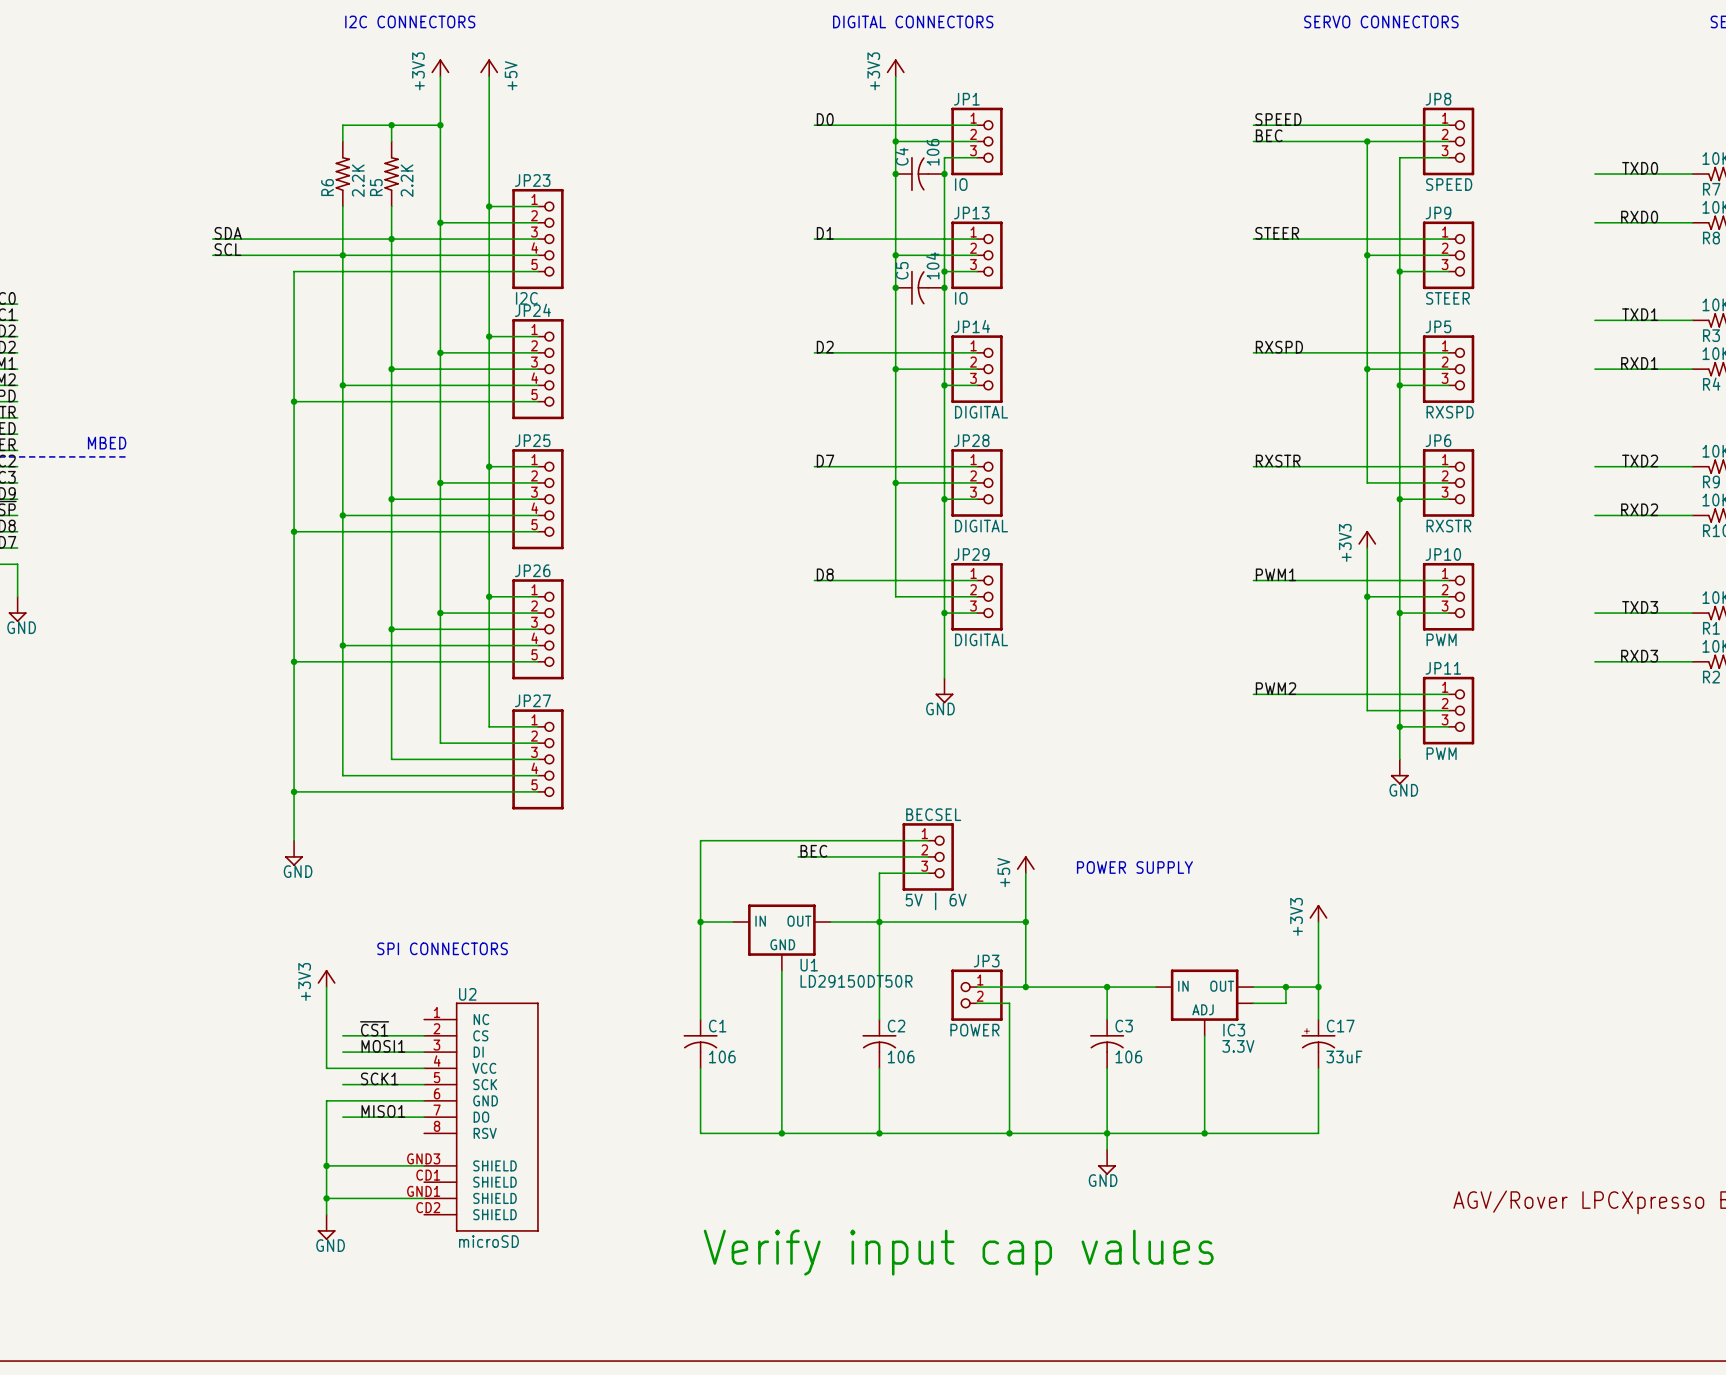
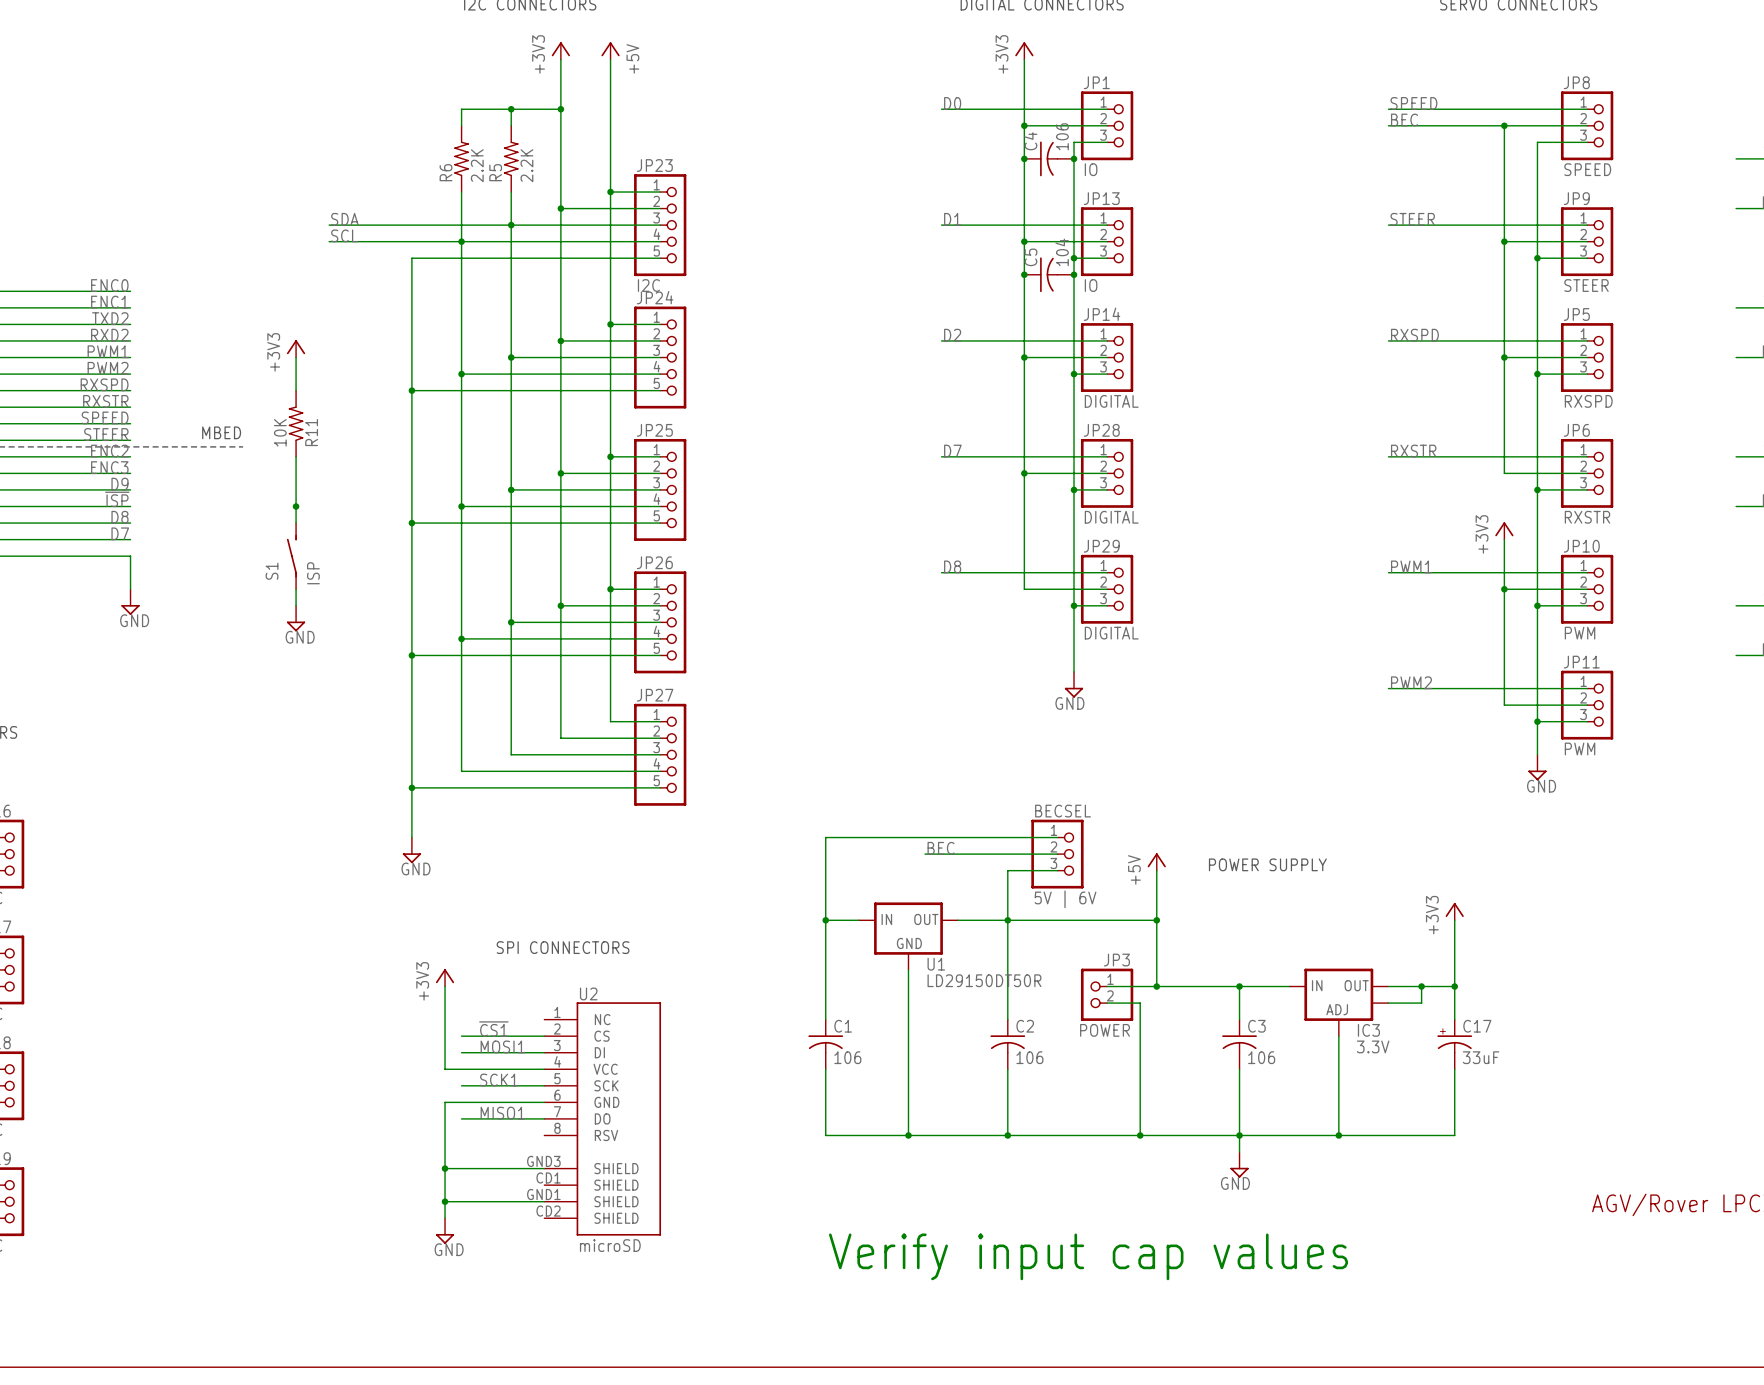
power symbol: none -> +3V3 (296, 348)
wire: none -> (296, 357) (296, 390)
R11: none -> 10K (296, 423)
wire: none -> (296, 456) (296, 523)
junction: none -> (296, 506)
S1: none -> ISP (291, 556)
wire: none -> (296, 589) (296, 605)
power symbol: none -> GND (296, 618)

